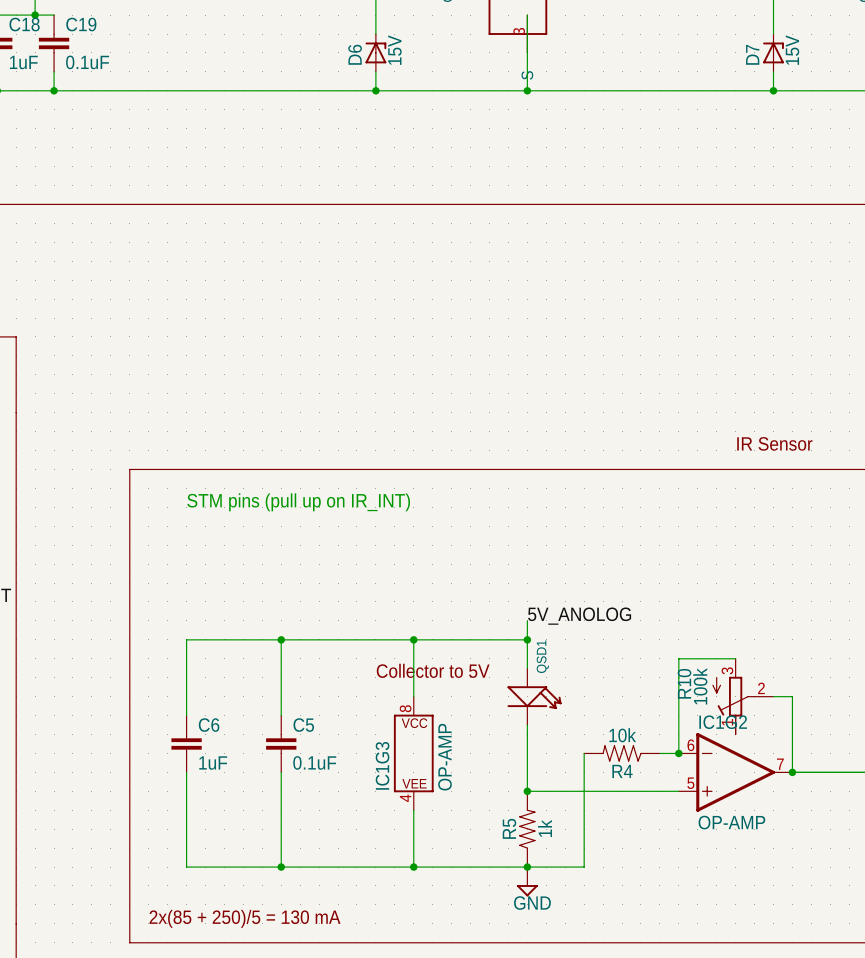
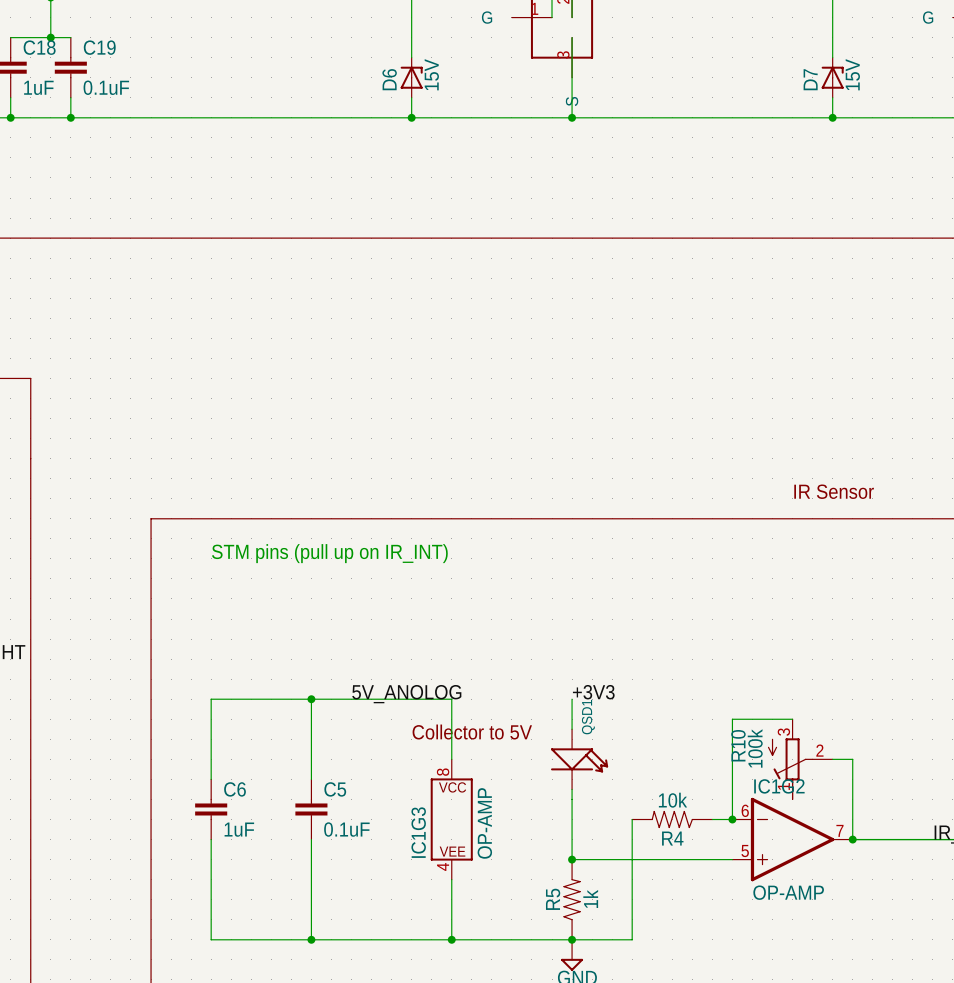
label: 5V_ANOLOG (579, 616) -> none
wire: (527, 620) (527, 639) (413, 639) -> none
label: none -> +3V3 (593, 692)
label: none -> 5V_ANOLOG (406, 694)
junction: (413, 639) -> none
junction: (527, 639) -> none

